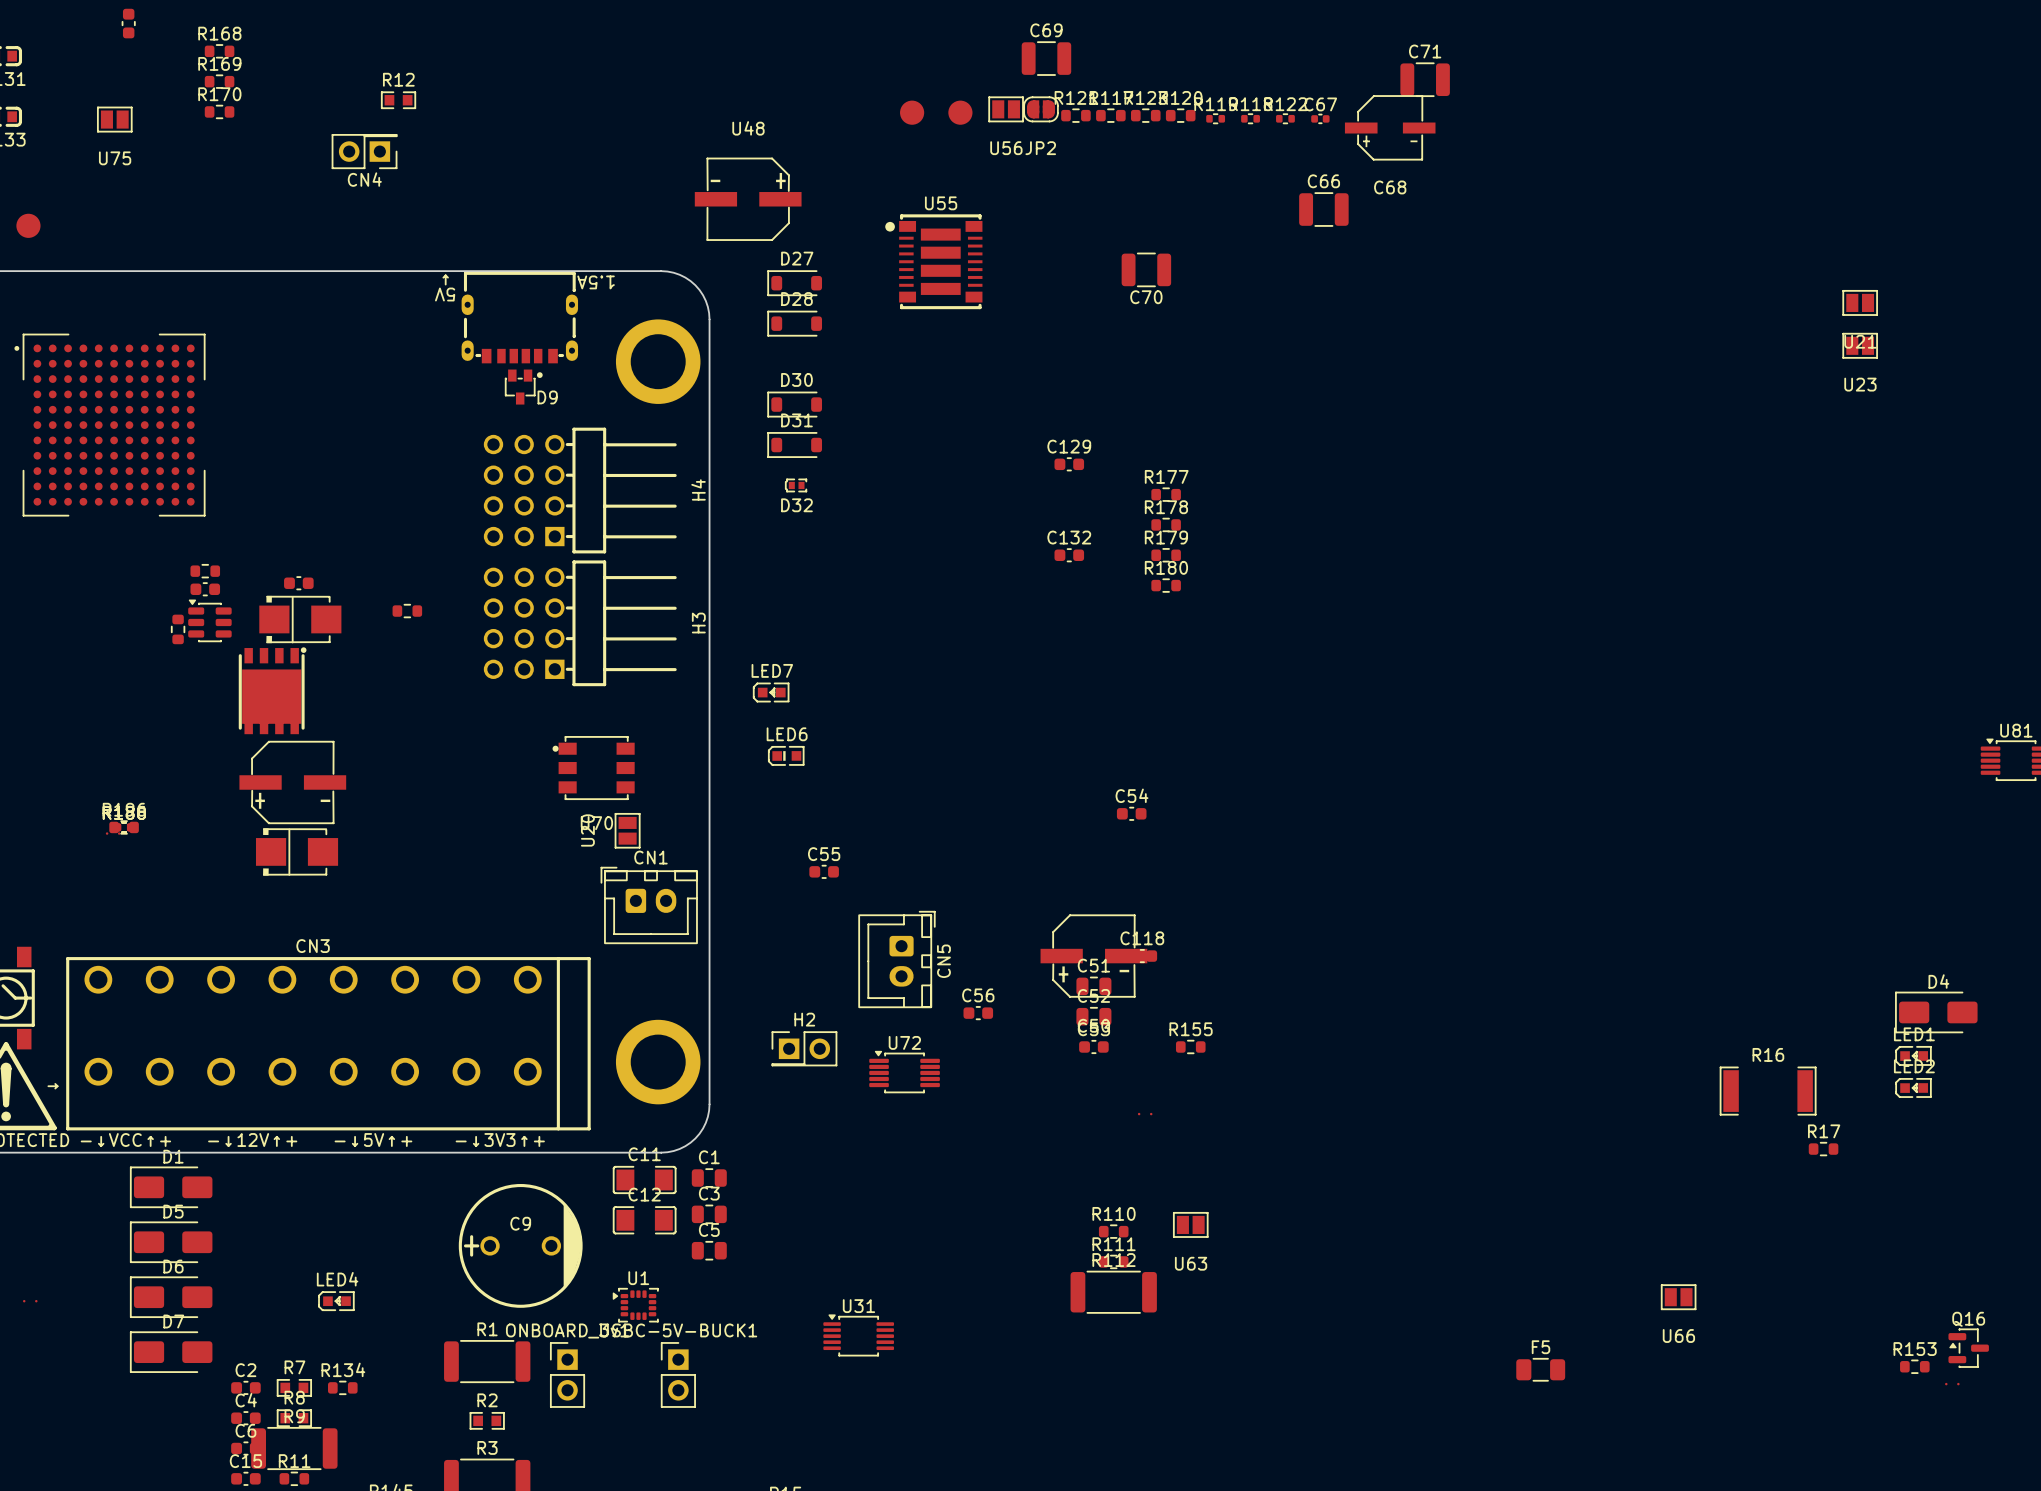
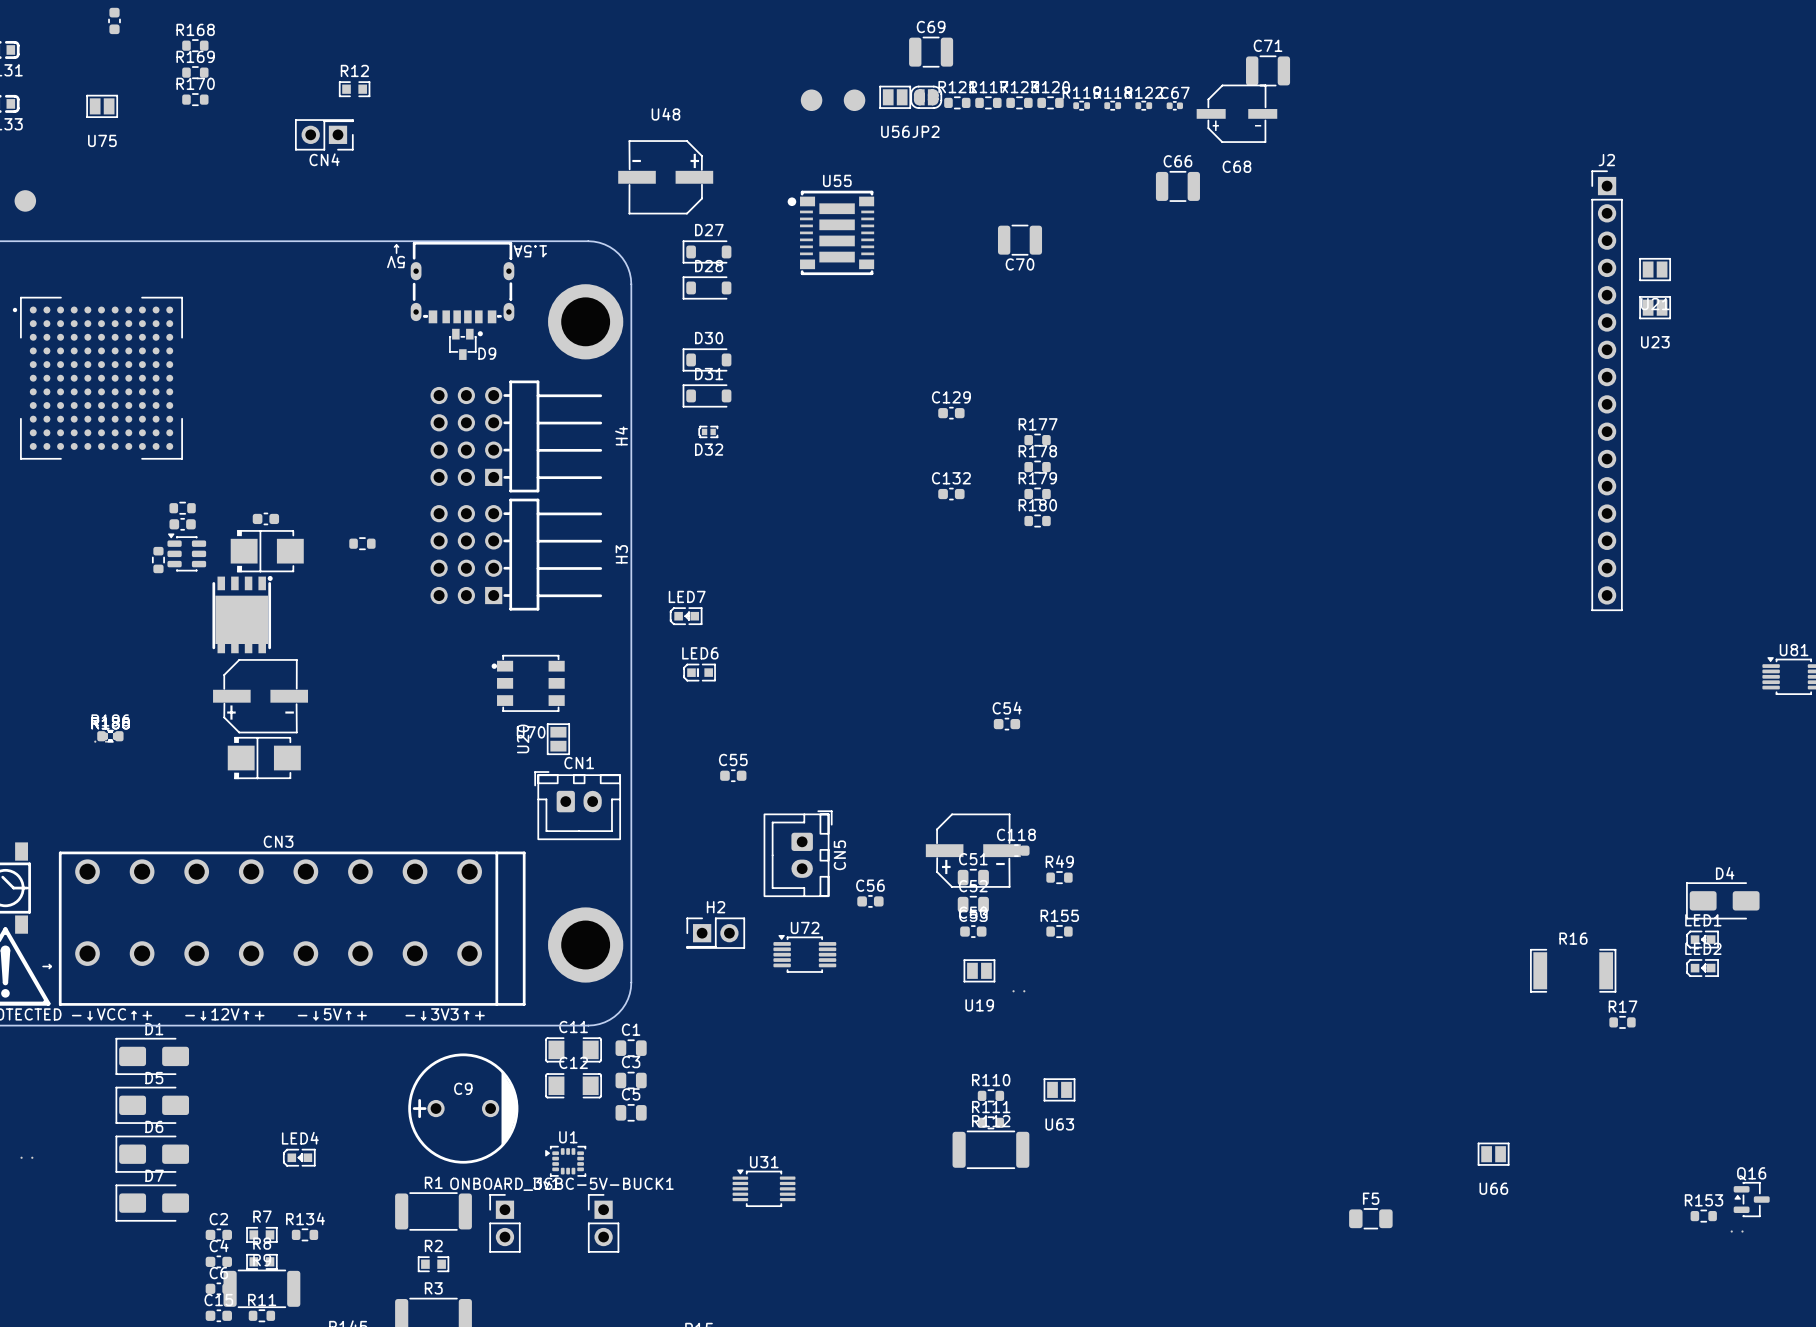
J2: none -> (1607, 390)
R49: none -> (1059, 877)
U19: none -> (979, 970)

